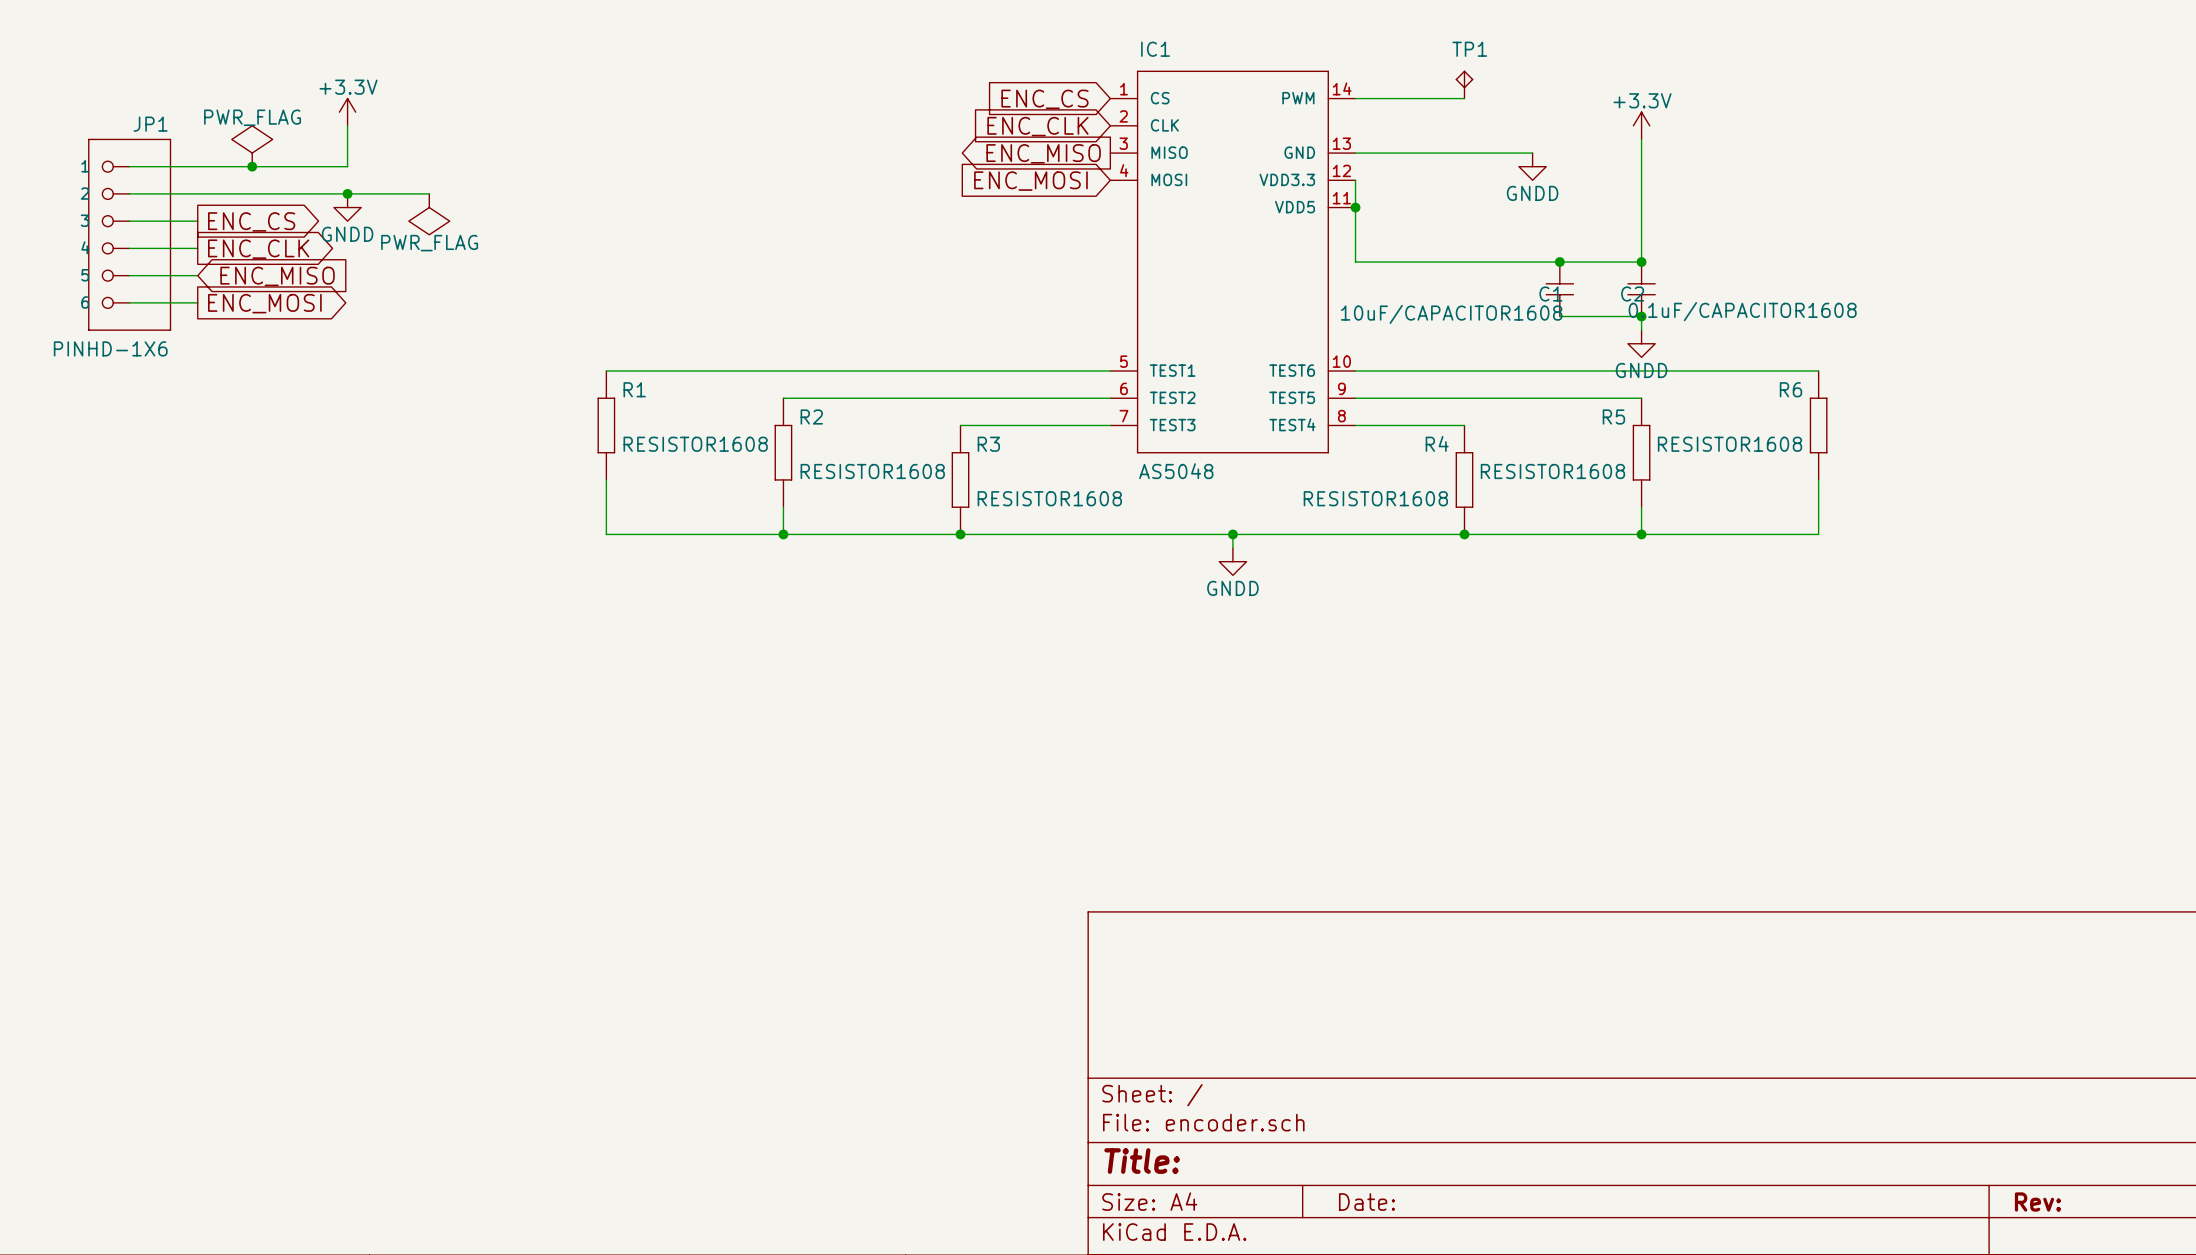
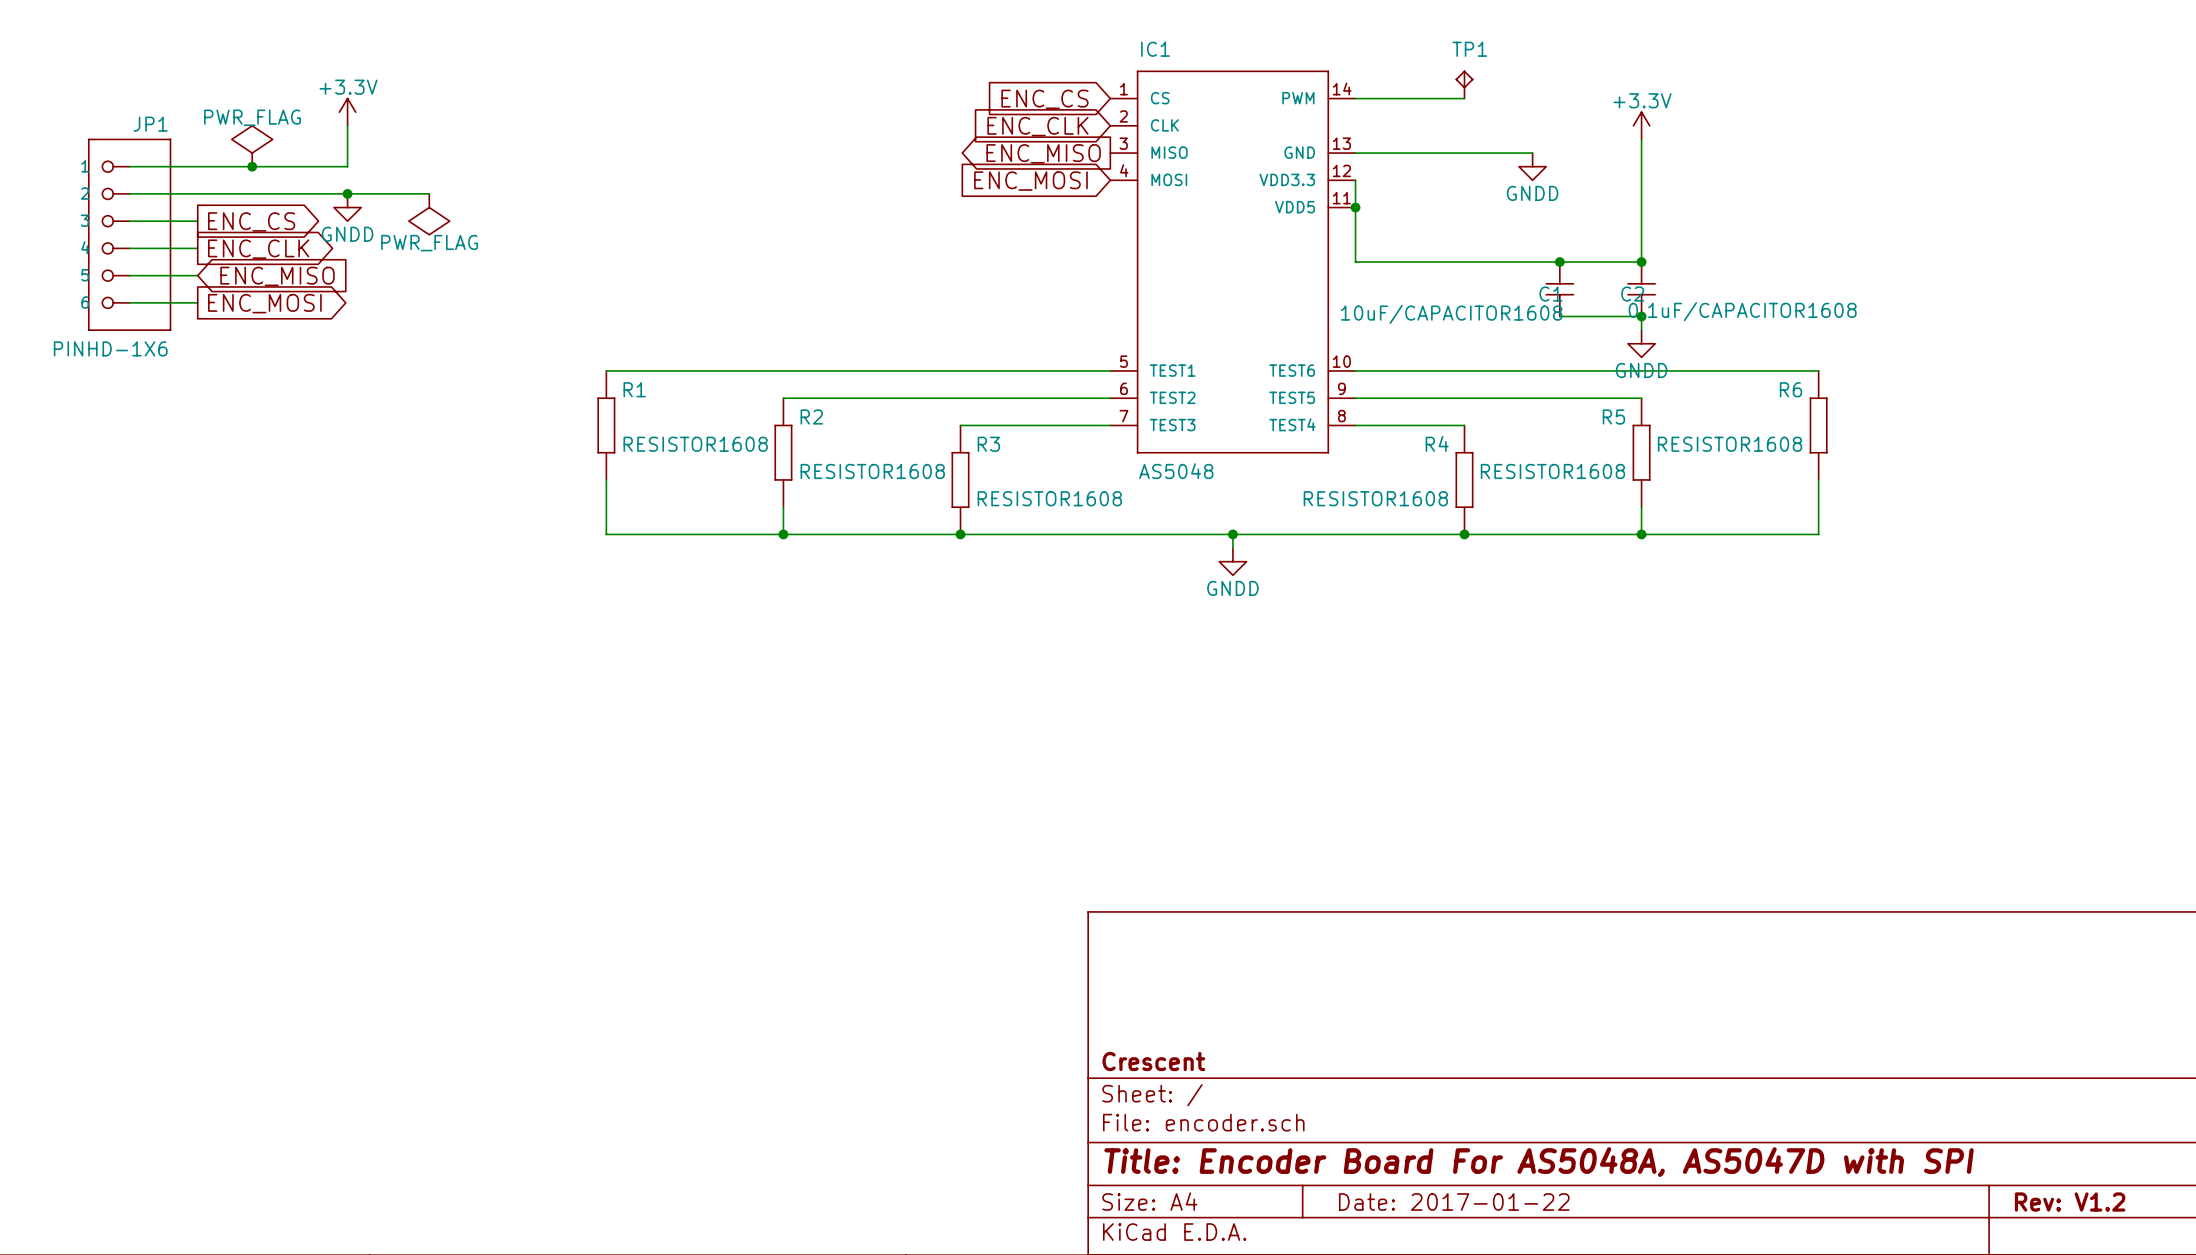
title block: none -> Crescent (1153, 1061)
title block: Title: (1142, 1161) -> Title: Encoder Board For AS5048A, AS5047D with SPI (1539, 1162)
title block: Date: (1366, 1202) -> Date: 2017-01-22 (1454, 1202)
title block: Rev: (2037, 1202) -> Rev: V1.2 (2070, 1202)

